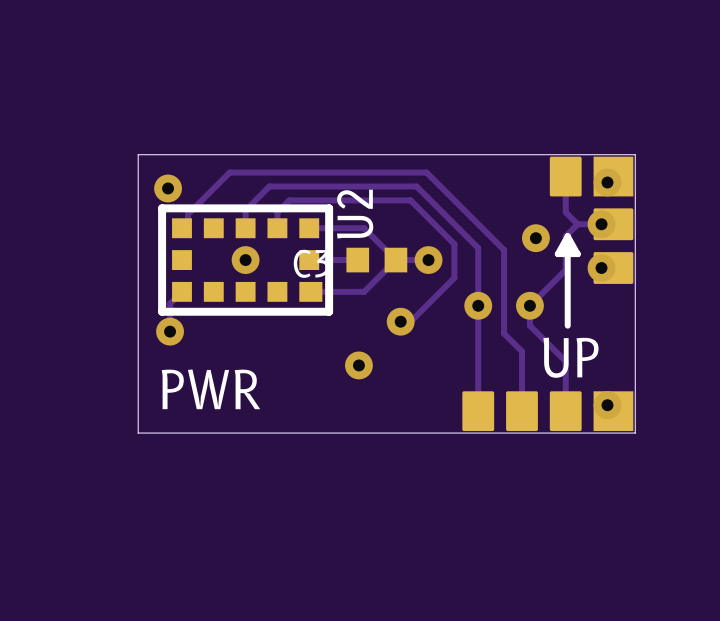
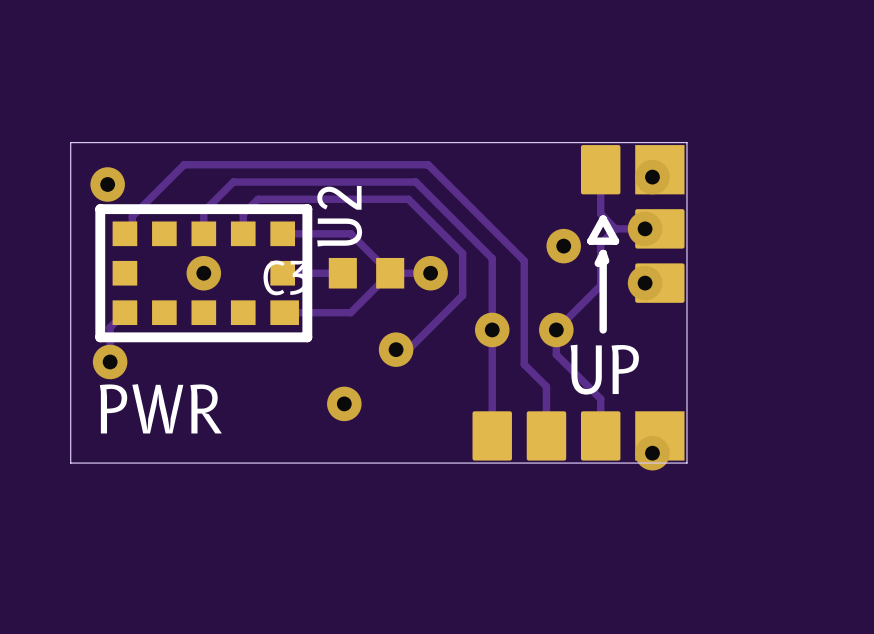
line: none -> (603, 219) (615, 241) (590, 241) (603, 219)
line: (577, 254) (567, 236) (557, 254) (577, 254) -> none
line: (567, 305) (567, 325) -> none
text position: UP (570, 357) -> UP (604, 369)
text position: PWR (210, 389) -> PWR (160, 408)
part position: (478, 411) -> (492, 435)
part position: (521, 411) -> (546, 435)
part position: (565, 411) -> (600, 435)
part position: (613, 411) -> (659, 435)
board edge: (635, 413) (635, 433) (138, 433) (138, 413) -> (686, 463) (70, 463)

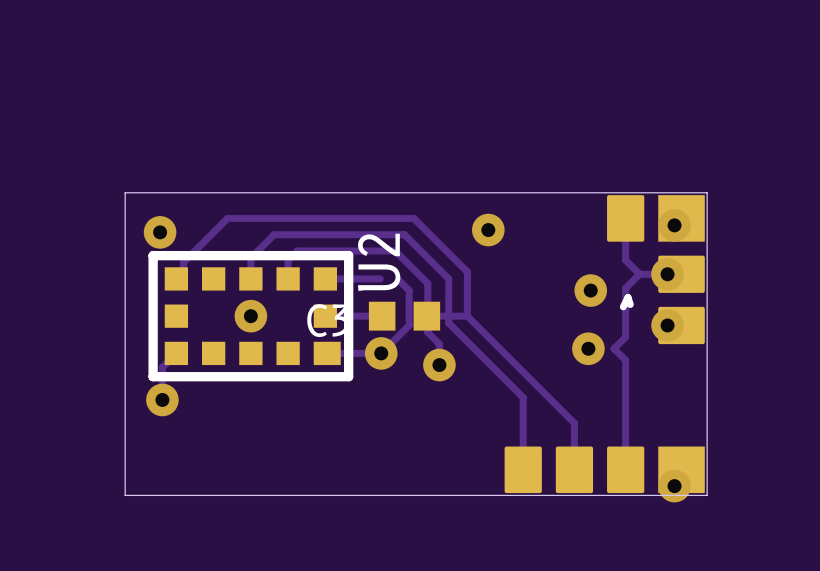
track: (179, 169) (184, 164) (428, 164) (524, 260) (524, 364) -> (227, 218) (413, 218) (467, 271) (467, 316) (553, 402)
via: none -> (488, 230)
track: (228, 186) (233, 182) (415, 182) (492, 258) (492, 359) -> (274, 234) (404, 234) (448, 278) (448, 323) (523, 397)
track: (253, 204) (258, 199) (408, 199) (462, 253) (462, 295) (408, 349) (396, 349) -> (297, 250) (395, 250) (427, 283) (427, 332) (439, 344) (439, 365)
line: (603, 219) (615, 241) (590, 241) (603, 219) -> none
track: (340, 233) (350, 233) (390, 273) (350, 312) (341, 312) -> (398, 279) (409, 290) (409, 325) (381, 353)
line: (603, 253) (603, 329) -> none
via: (430, 273) -> none
track: (600, 285) (556, 329) (556, 354) (600, 398) -> (625, 327) (625, 337) (614, 348) (625, 360) (625, 434)
via: none -> (381, 353)
via: (492, 329) -> none
via position: (556, 329) -> (588, 348)
via position: (396, 349) -> (439, 365)
text: UP (604, 369) -> none
via: (344, 403) -> none
text: PWR (160, 408) -> none

